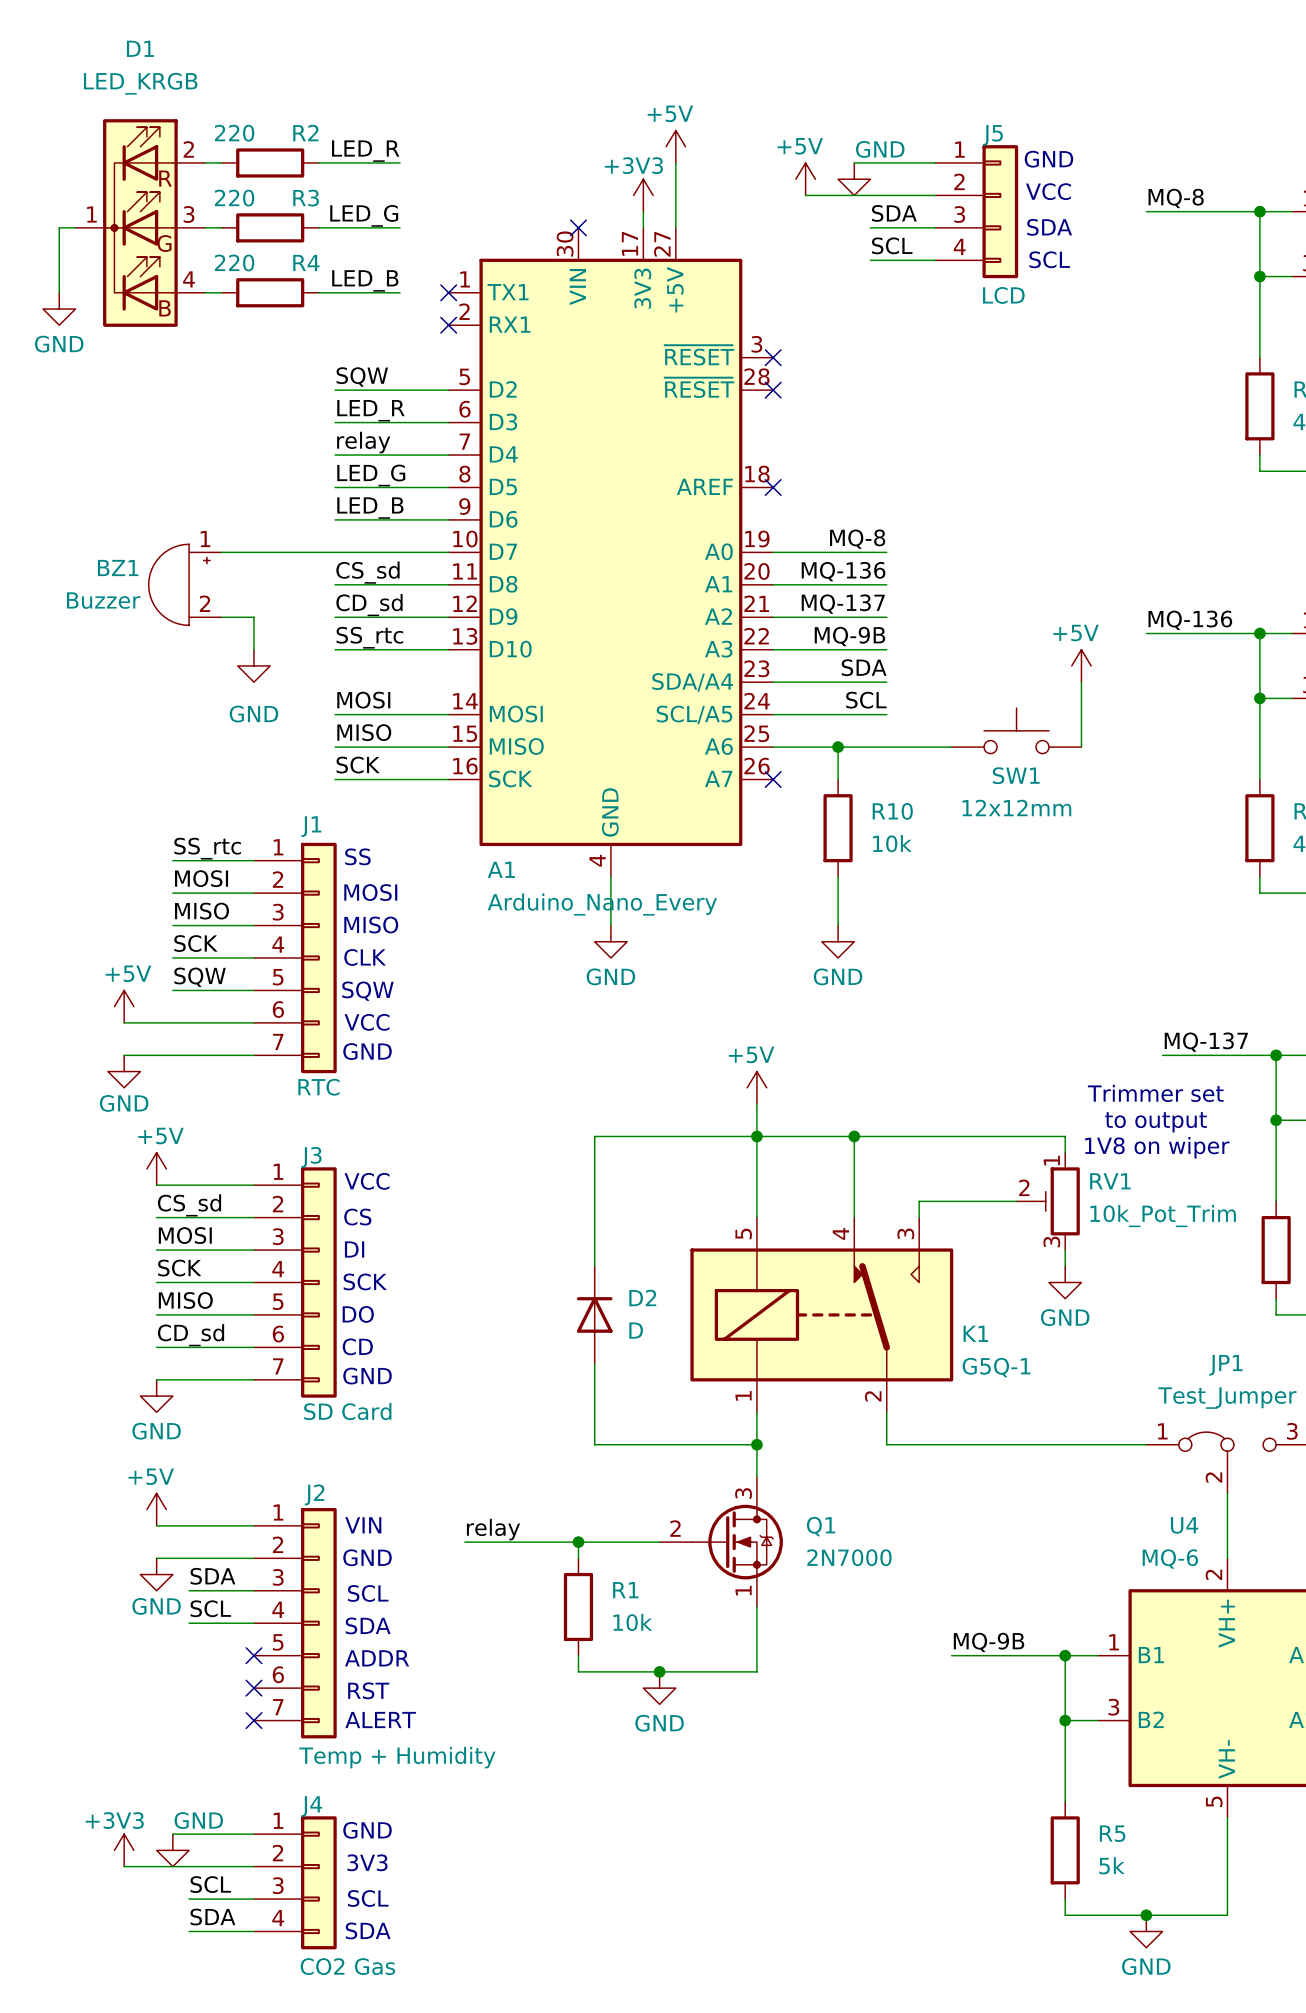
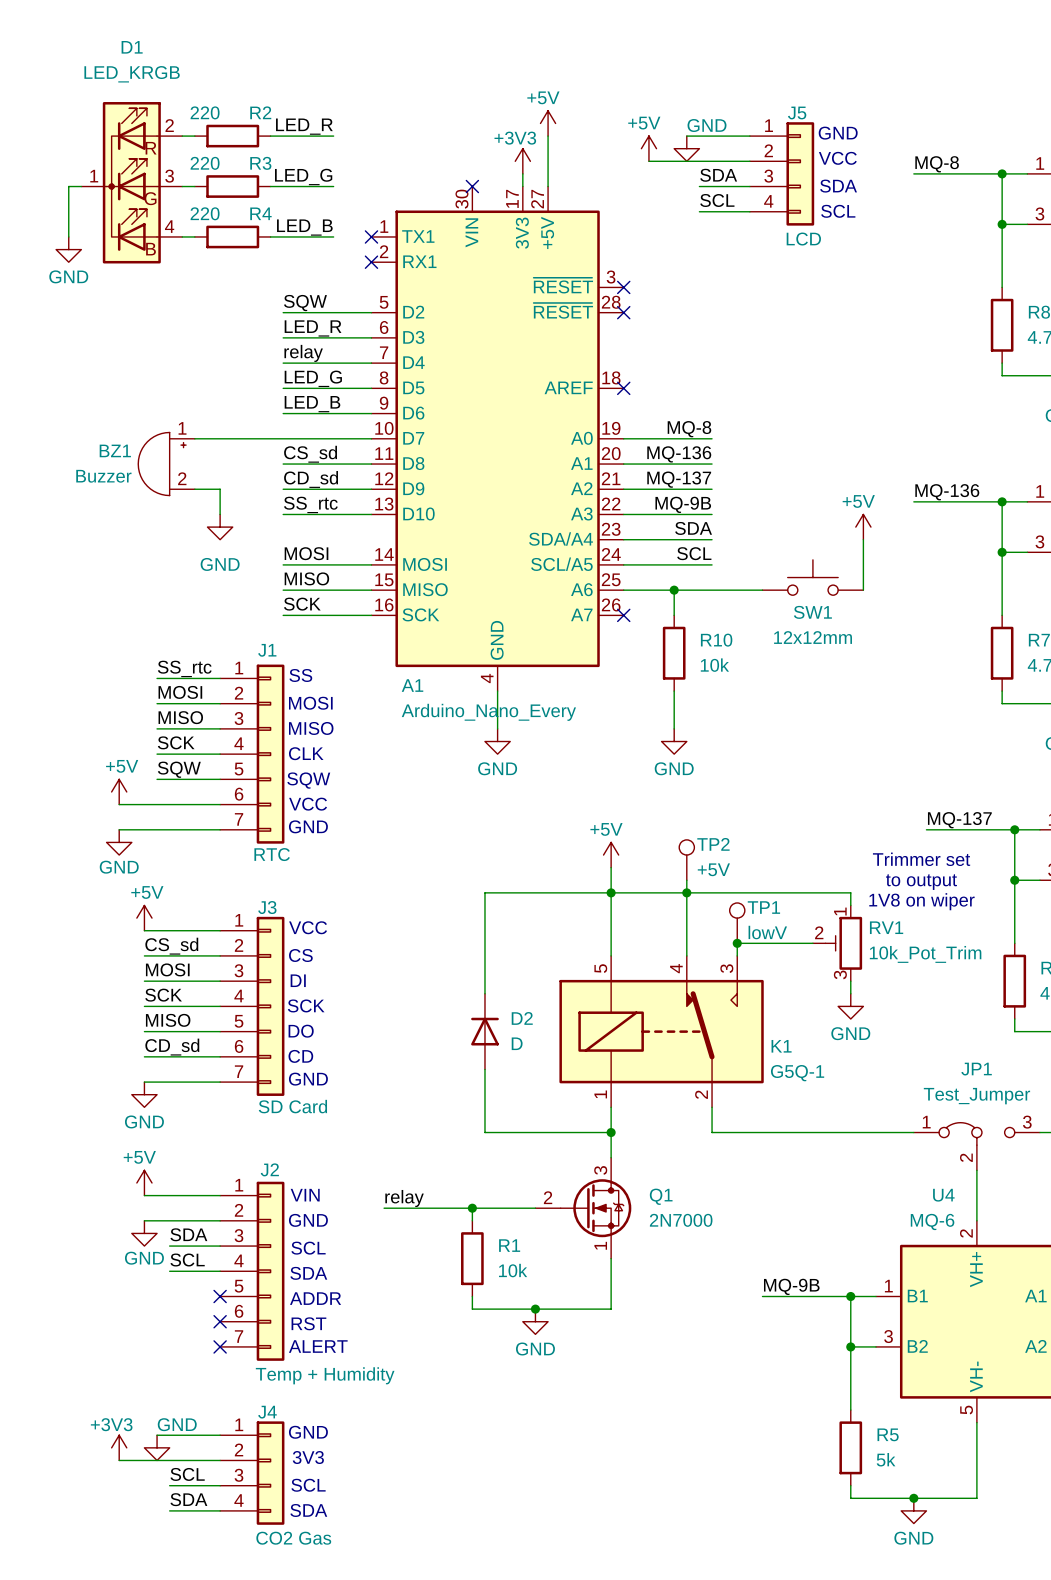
TP2: none -> +5V (686, 860)
wire: none -> (686, 880) (686, 892)
TP1: none -> lowV (737, 923)
junction: none -> (737, 943)

